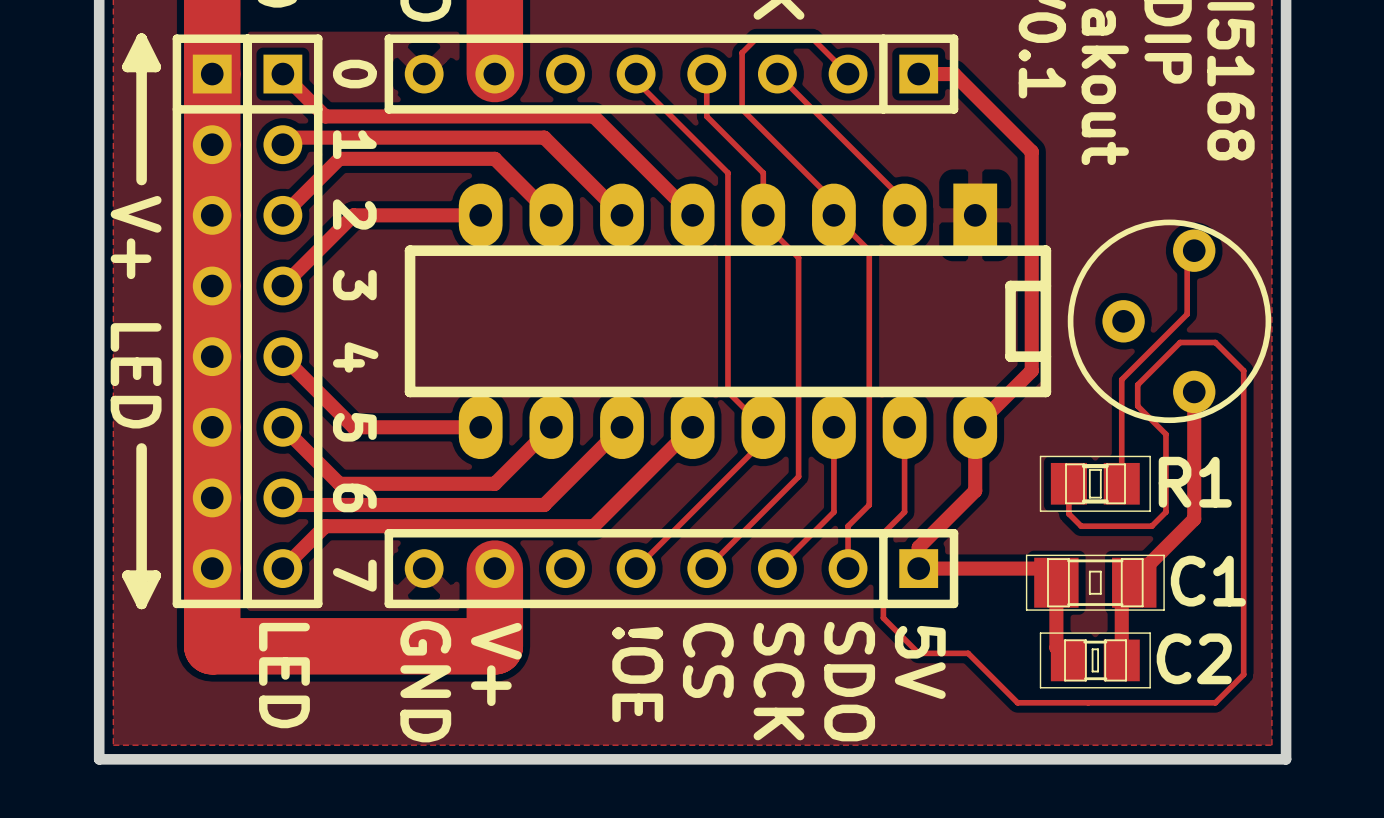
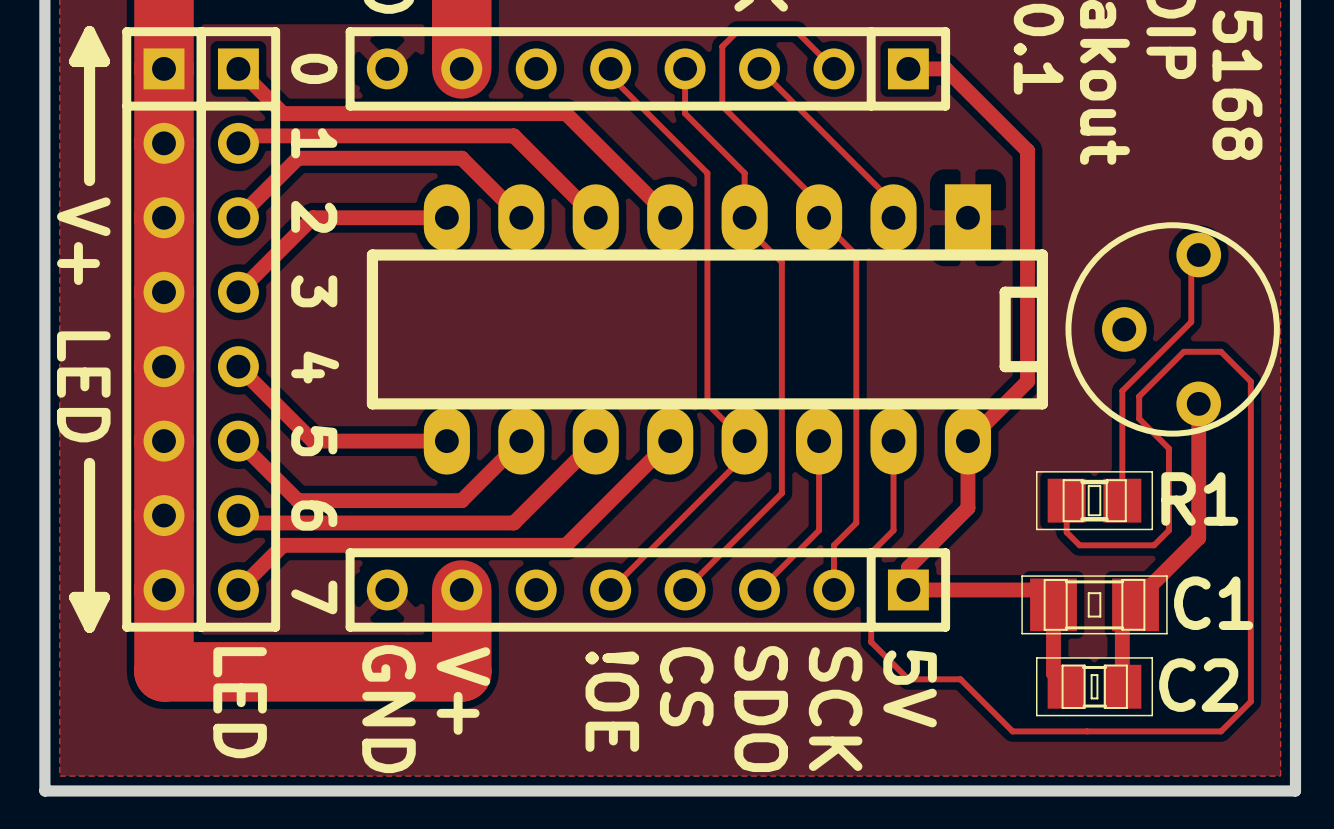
text: SCK (779, 681) -> SDO (761, 709)
text: SDO (849, 681) -> SCK (835, 709)

